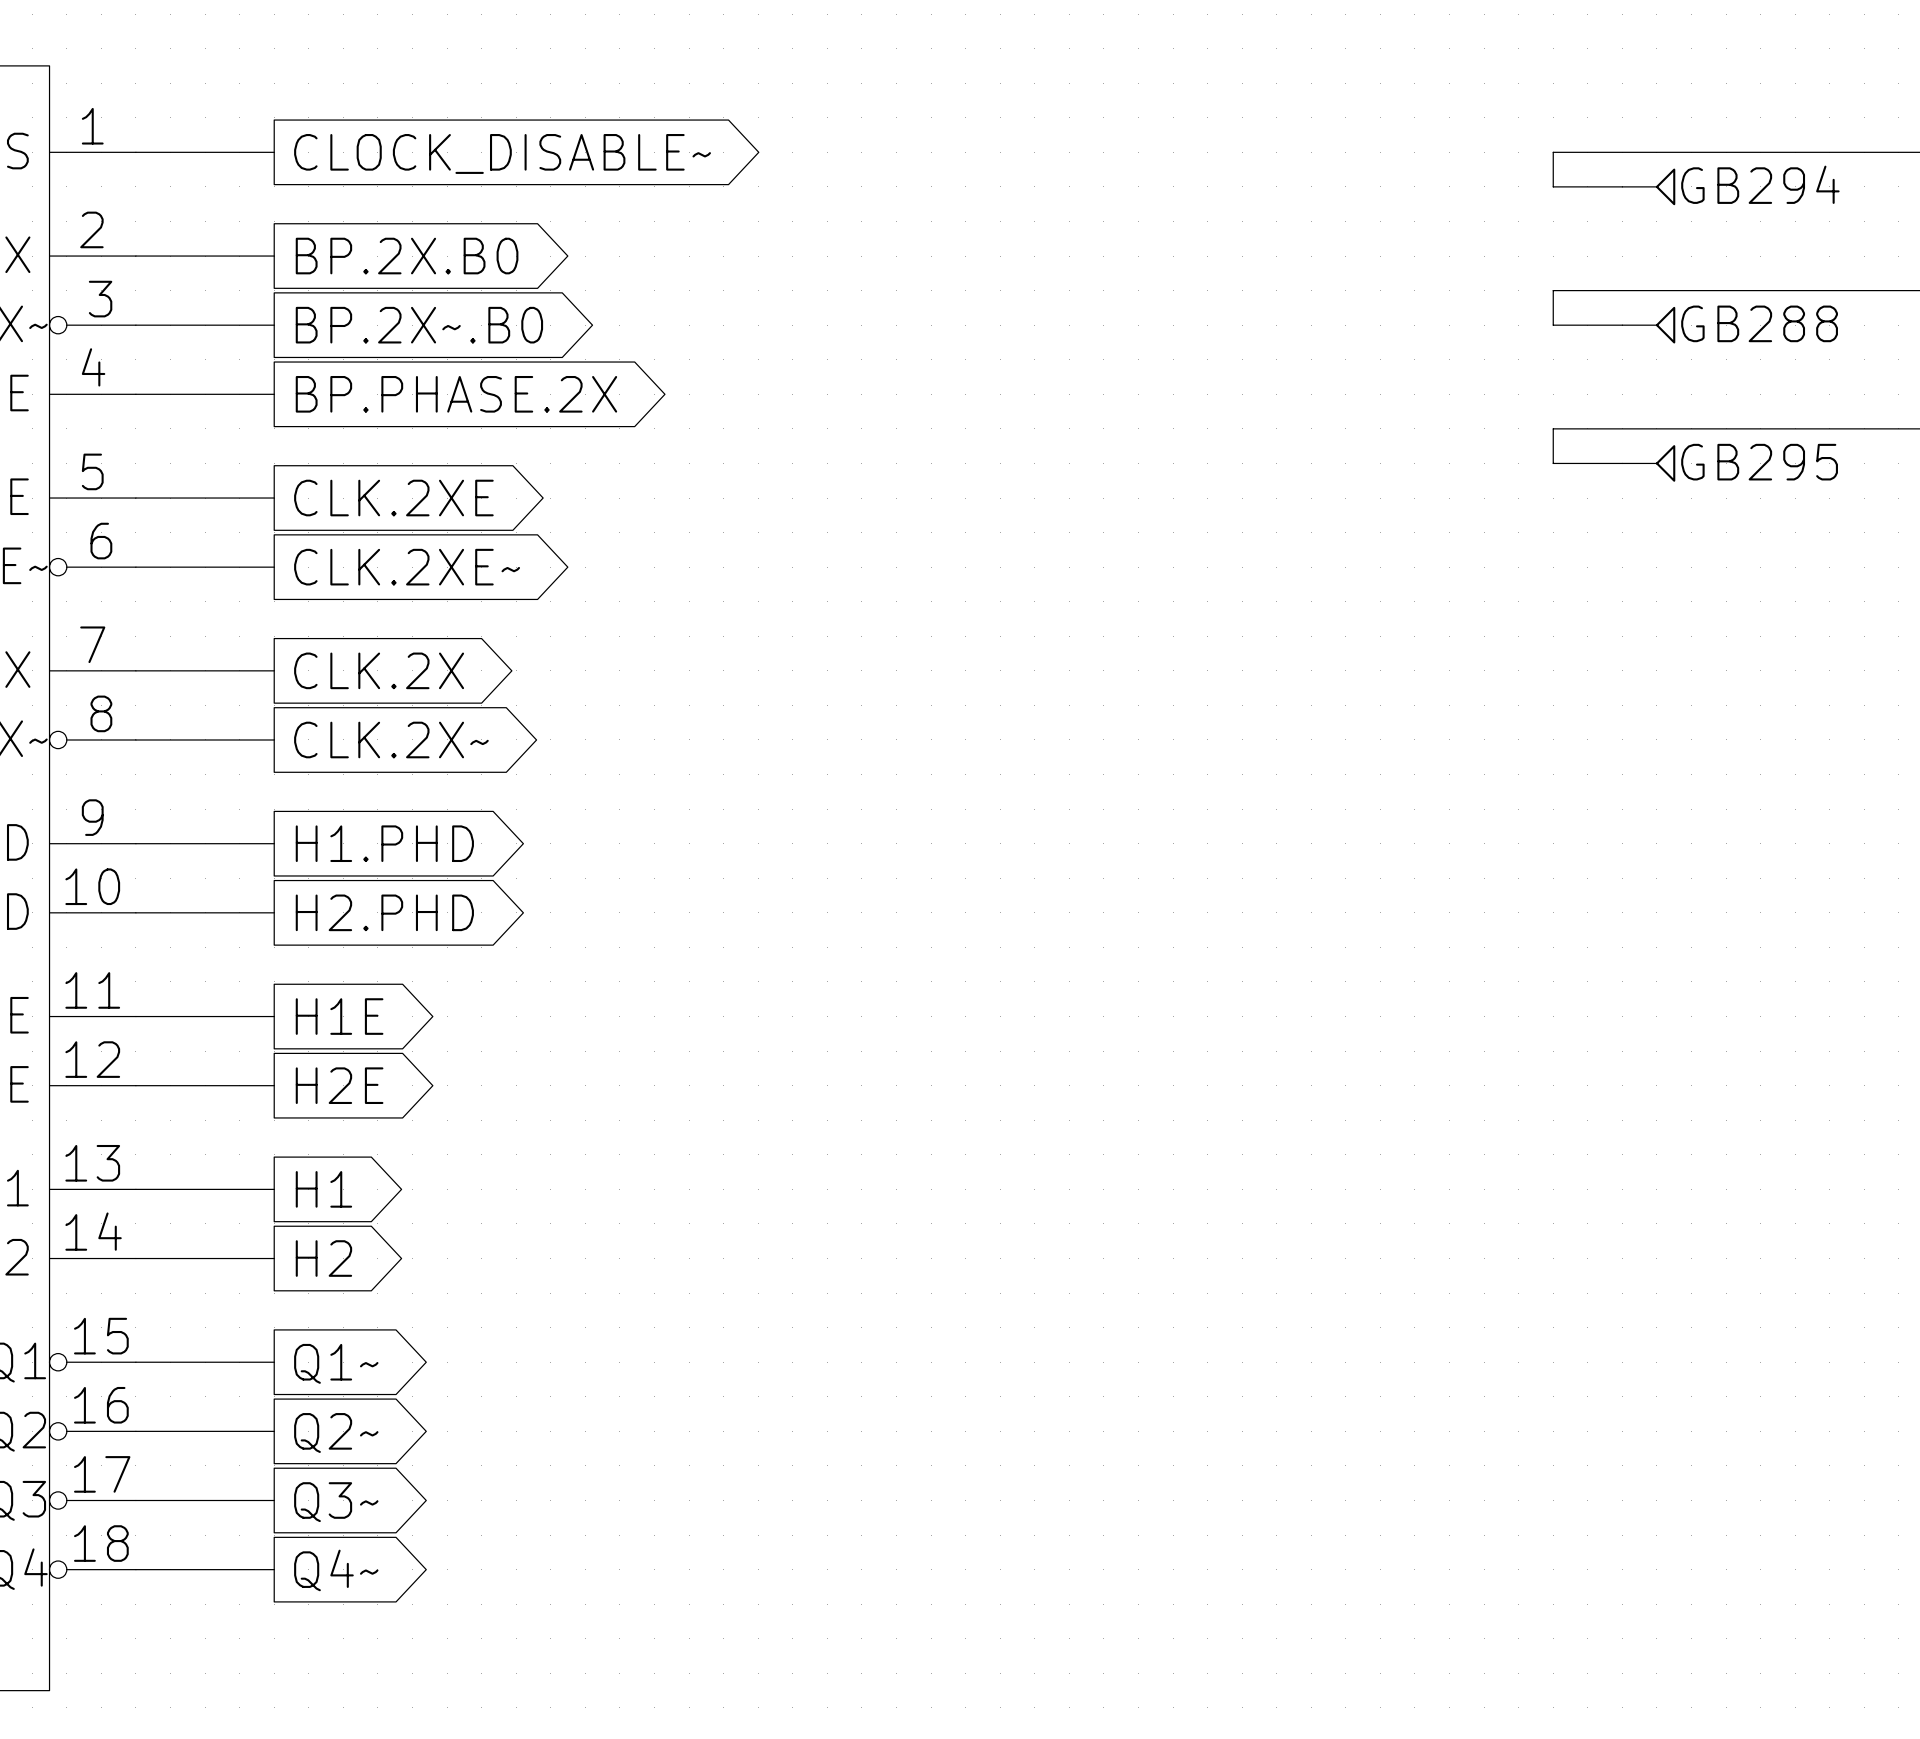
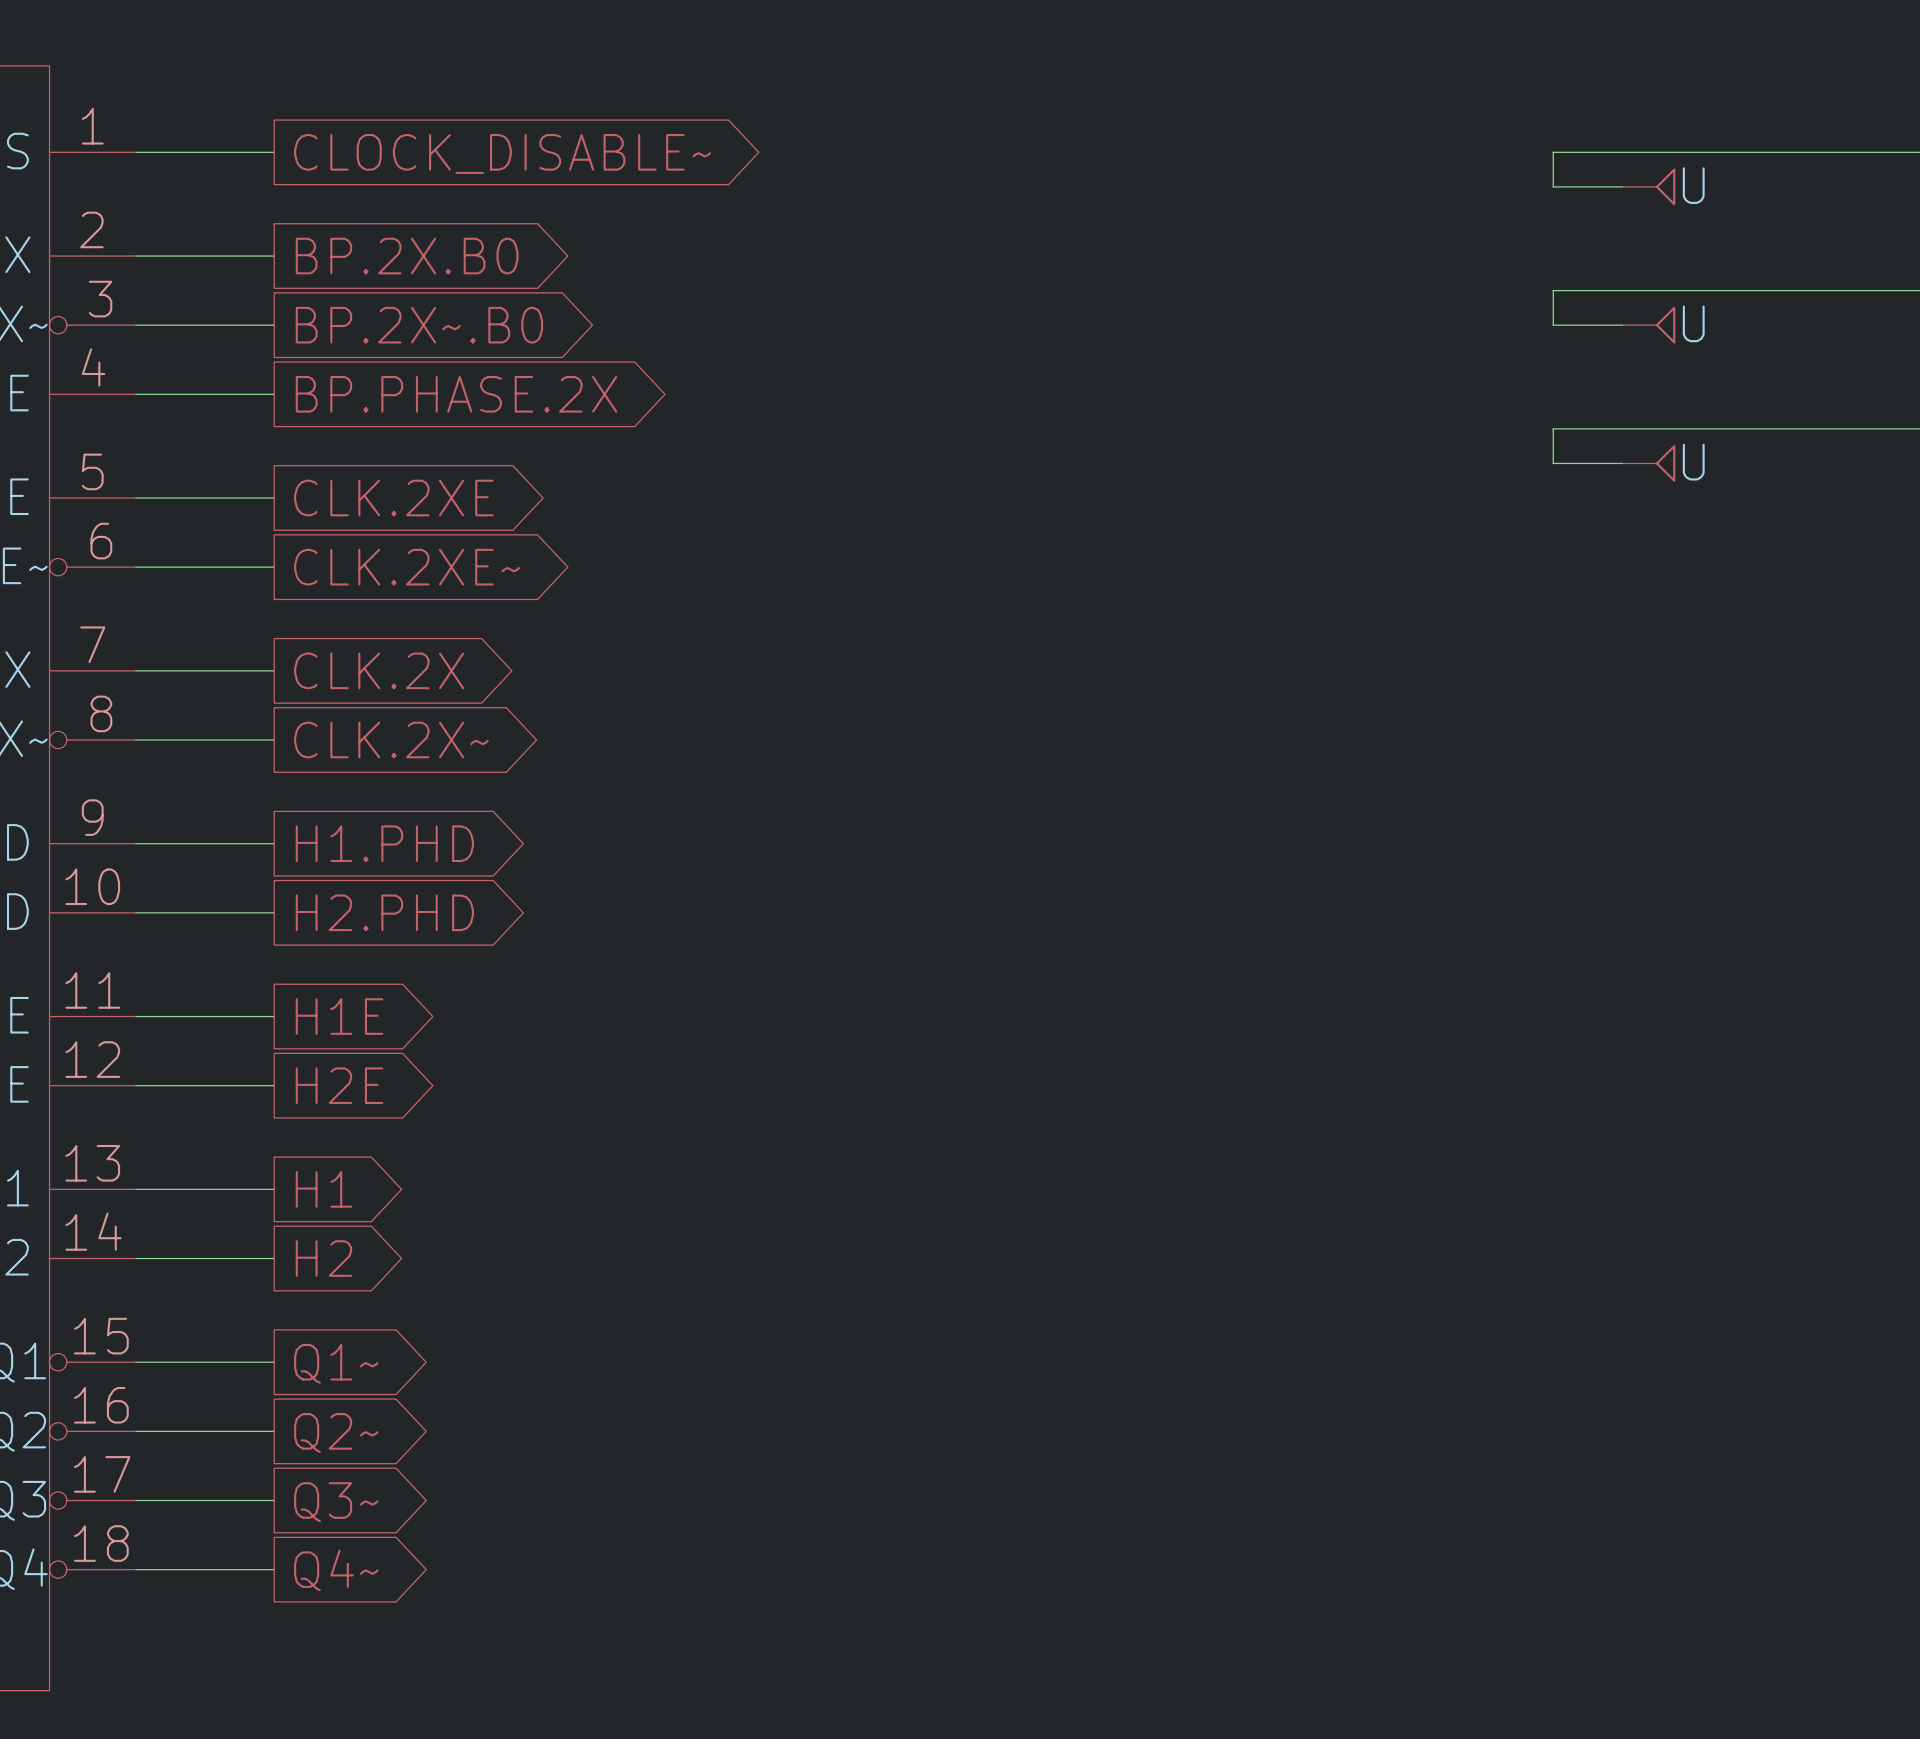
GB294 name: GB294 (1760, 184) -> U (1693, 185)
GB288 name: GB288 (1759, 323) -> U (1693, 323)
GB295 name: GB295 (1759, 462) -> U (1693, 462)

